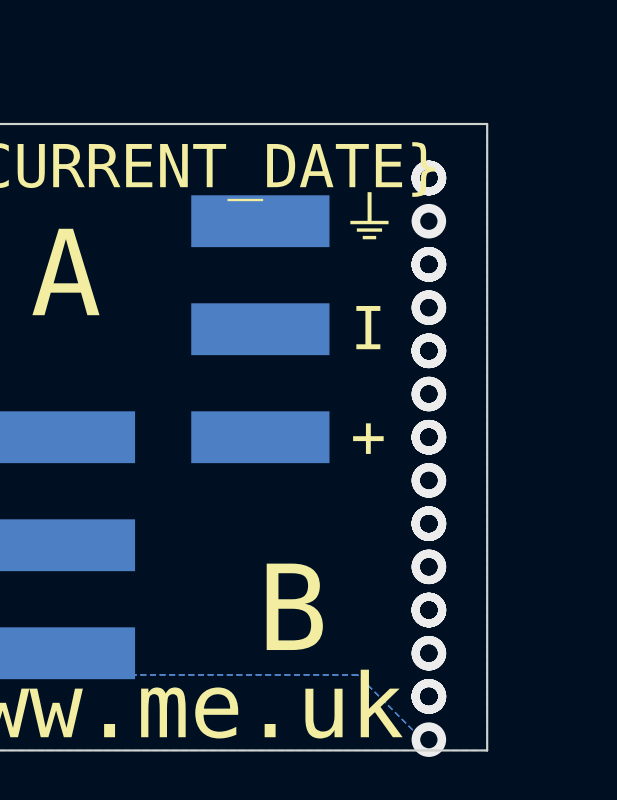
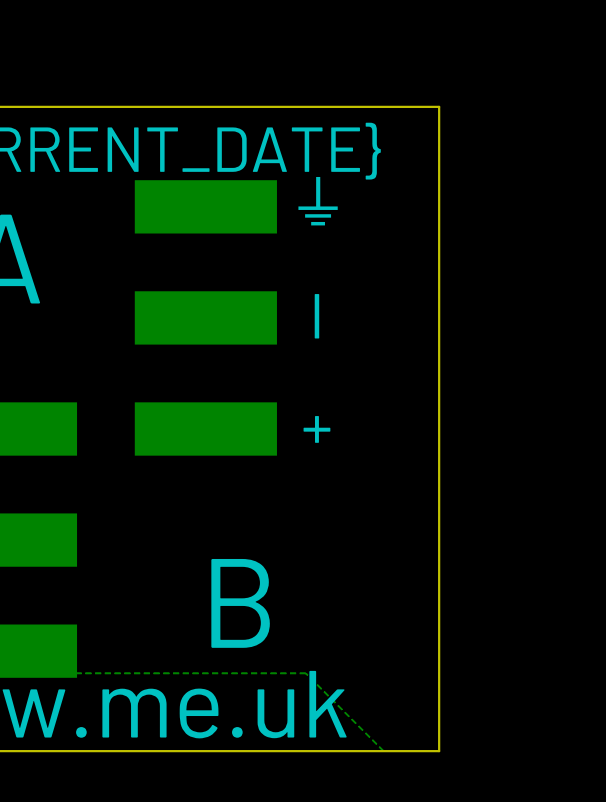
via: (428, 178) -> none
via: (428, 221) -> none
via: (428, 264) -> none
via: (428, 307) -> none
via: (428, 350) -> none
via: (428, 394) -> none
via: (428, 437) -> none
via: (428, 480) -> none
via: (428, 523) -> none
via: (428, 566) -> none
via: (428, 610) -> none
via: (428, 653) -> none
via: (428, 696) -> none
via: (428, 739) -> none

